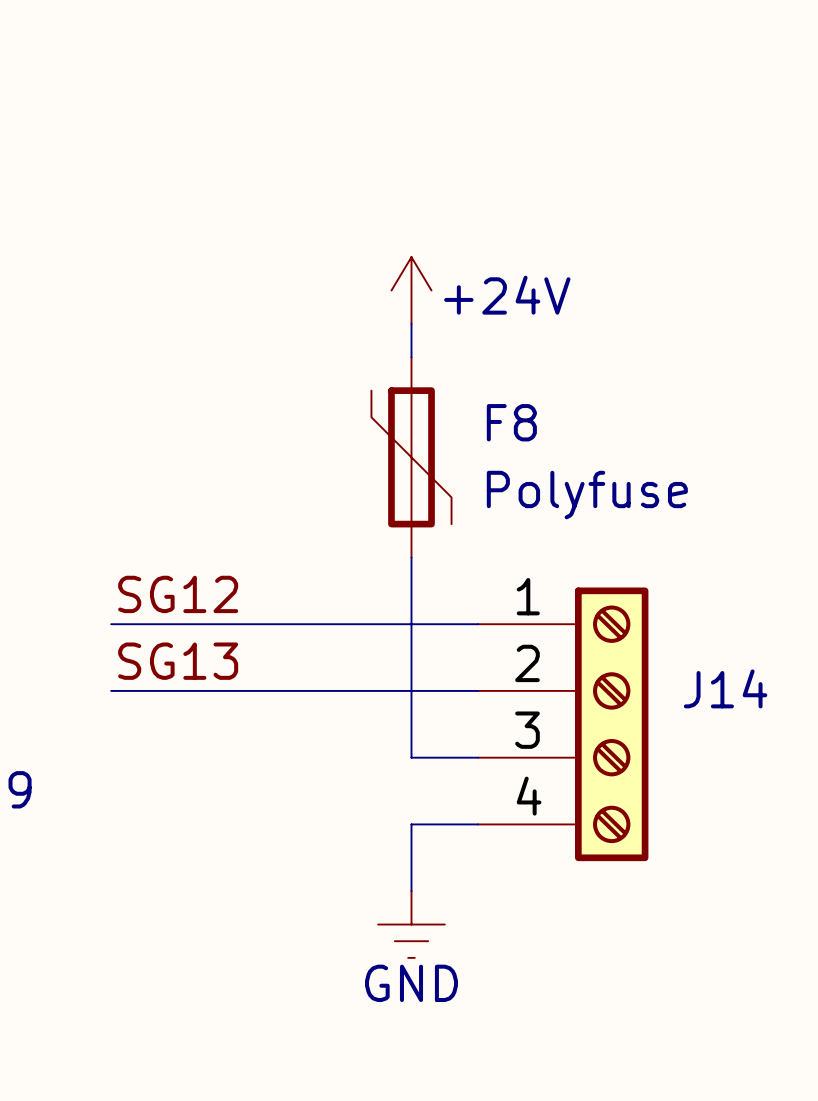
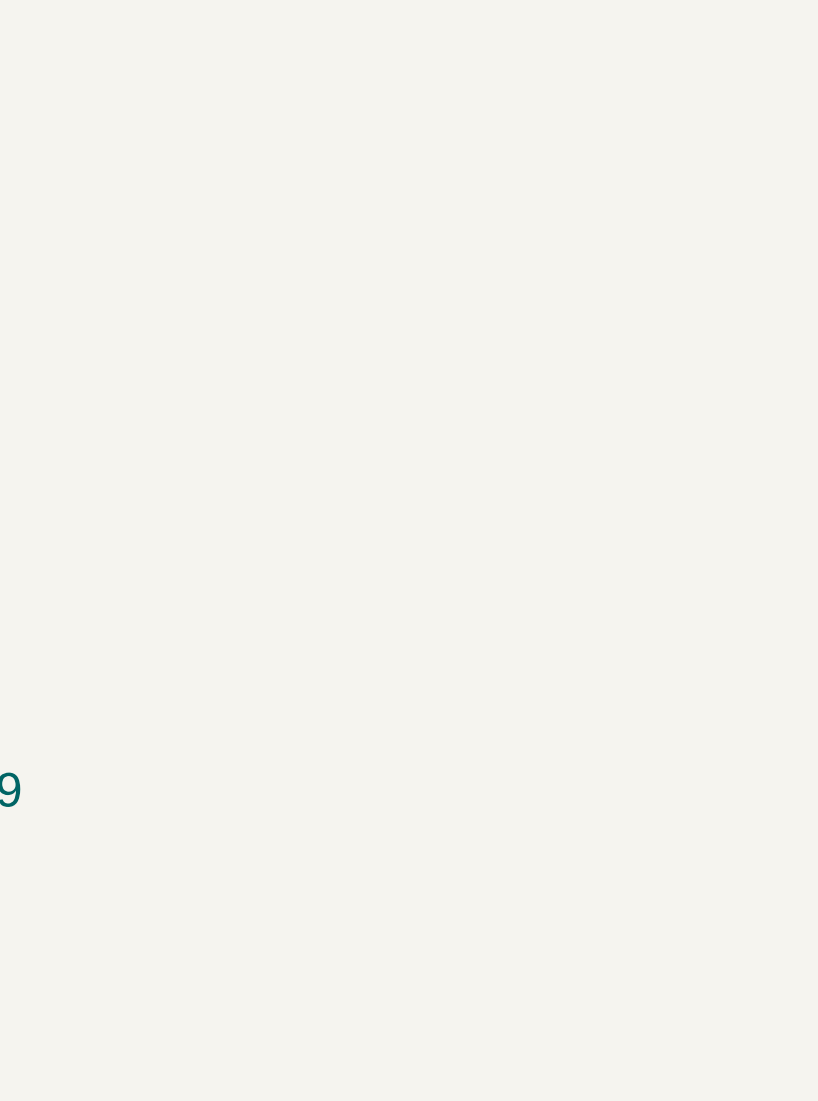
power symbol: +24V (411, 290) -> none
wire: (411, 323) (411, 357) -> none
F8: Polyfuse (411, 457) -> none
wire: (411, 557) (411, 757) (478, 757) -> none
label: SG12 (178, 594) -> none
wire: (111, 624) (478, 624) -> none
label: SG13 (178, 661) -> none
wire: (111, 690) (478, 690) -> none
J14: (563, 724) -> none
wire: (478, 824) (411, 824) (411, 891) -> none
power symbol: GND (411, 924) -> none

